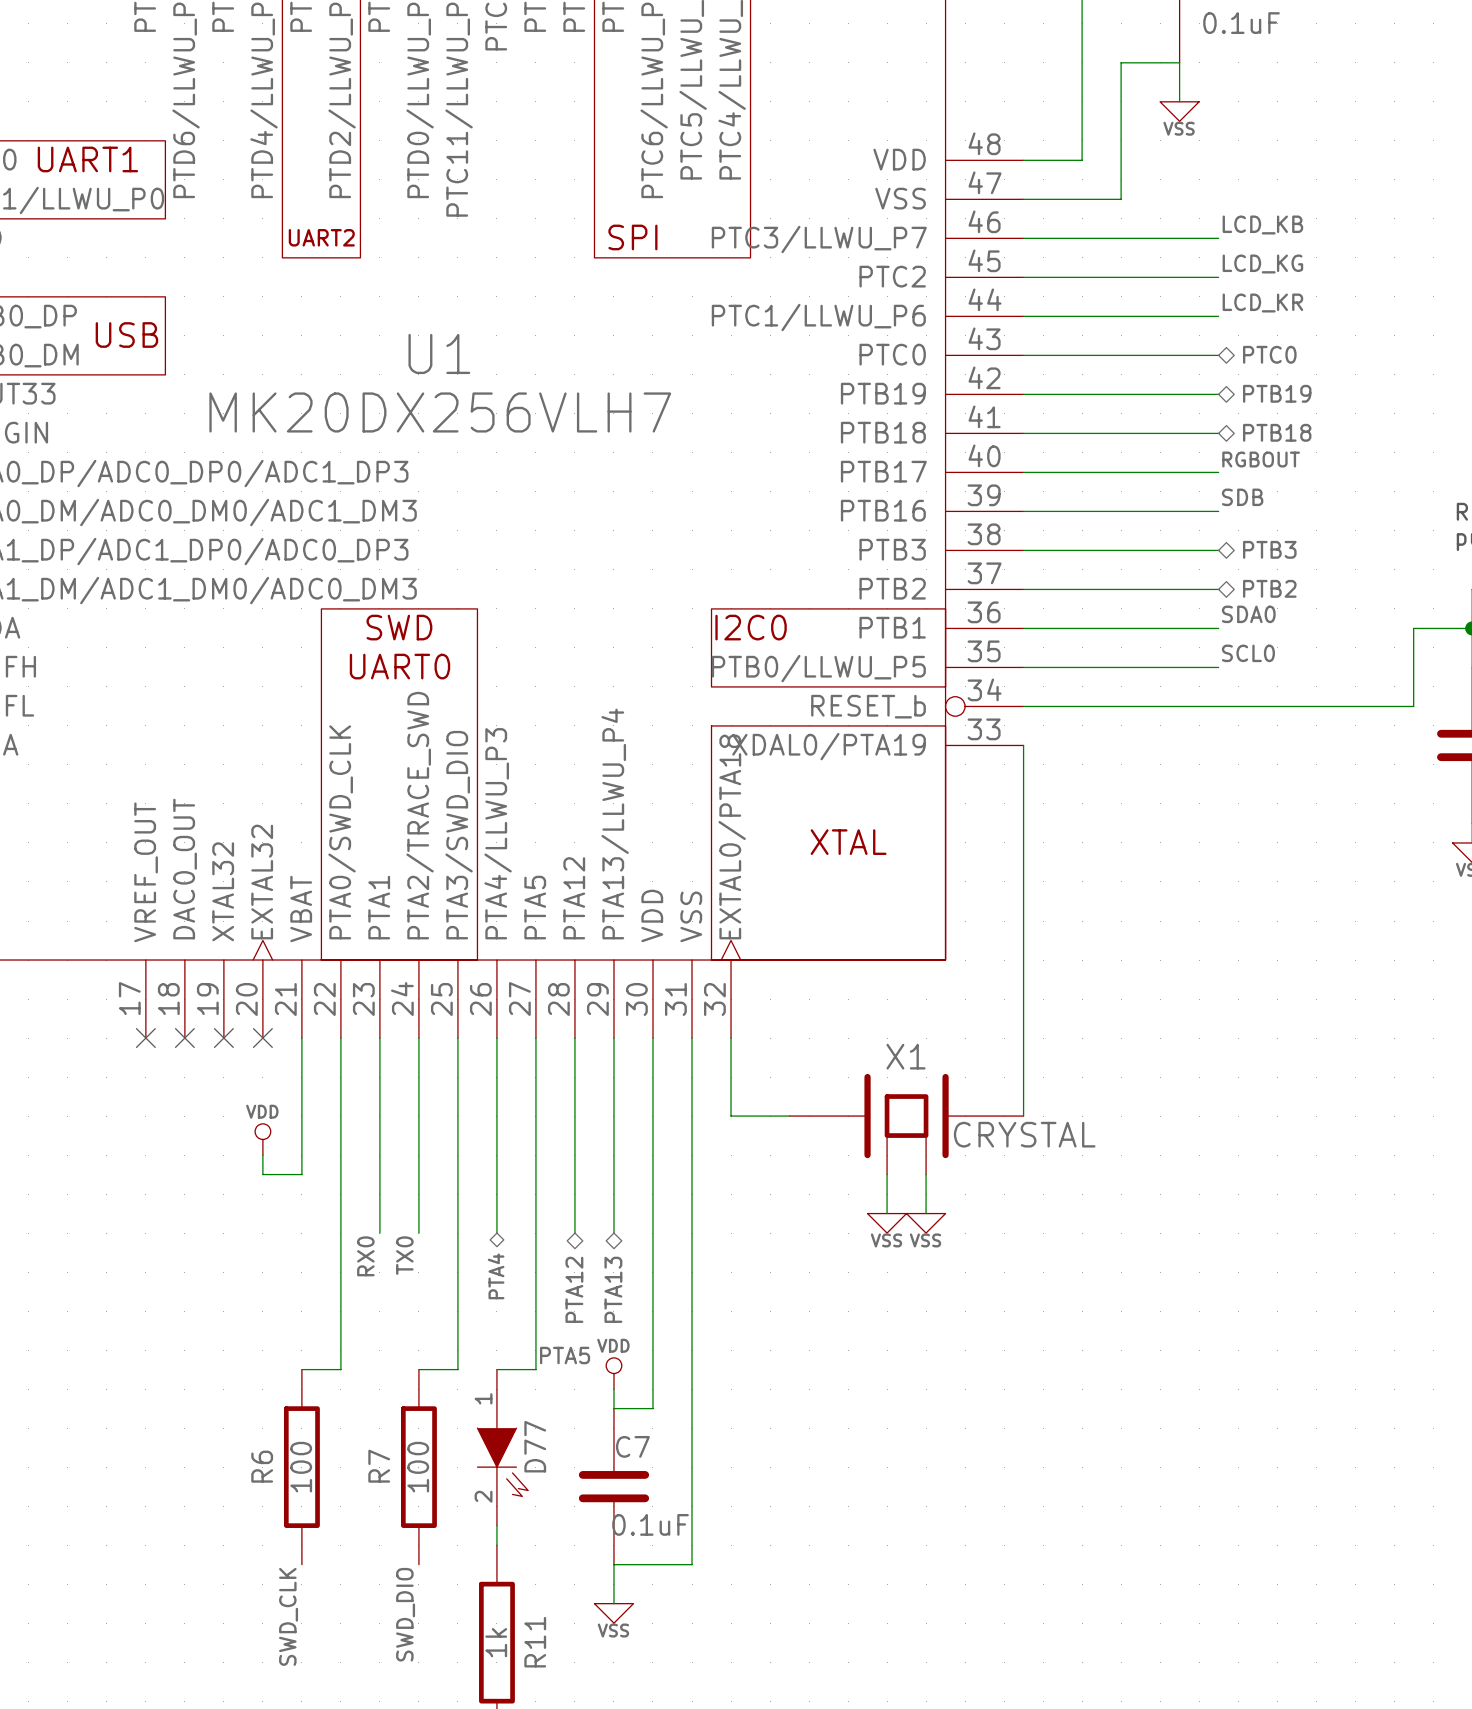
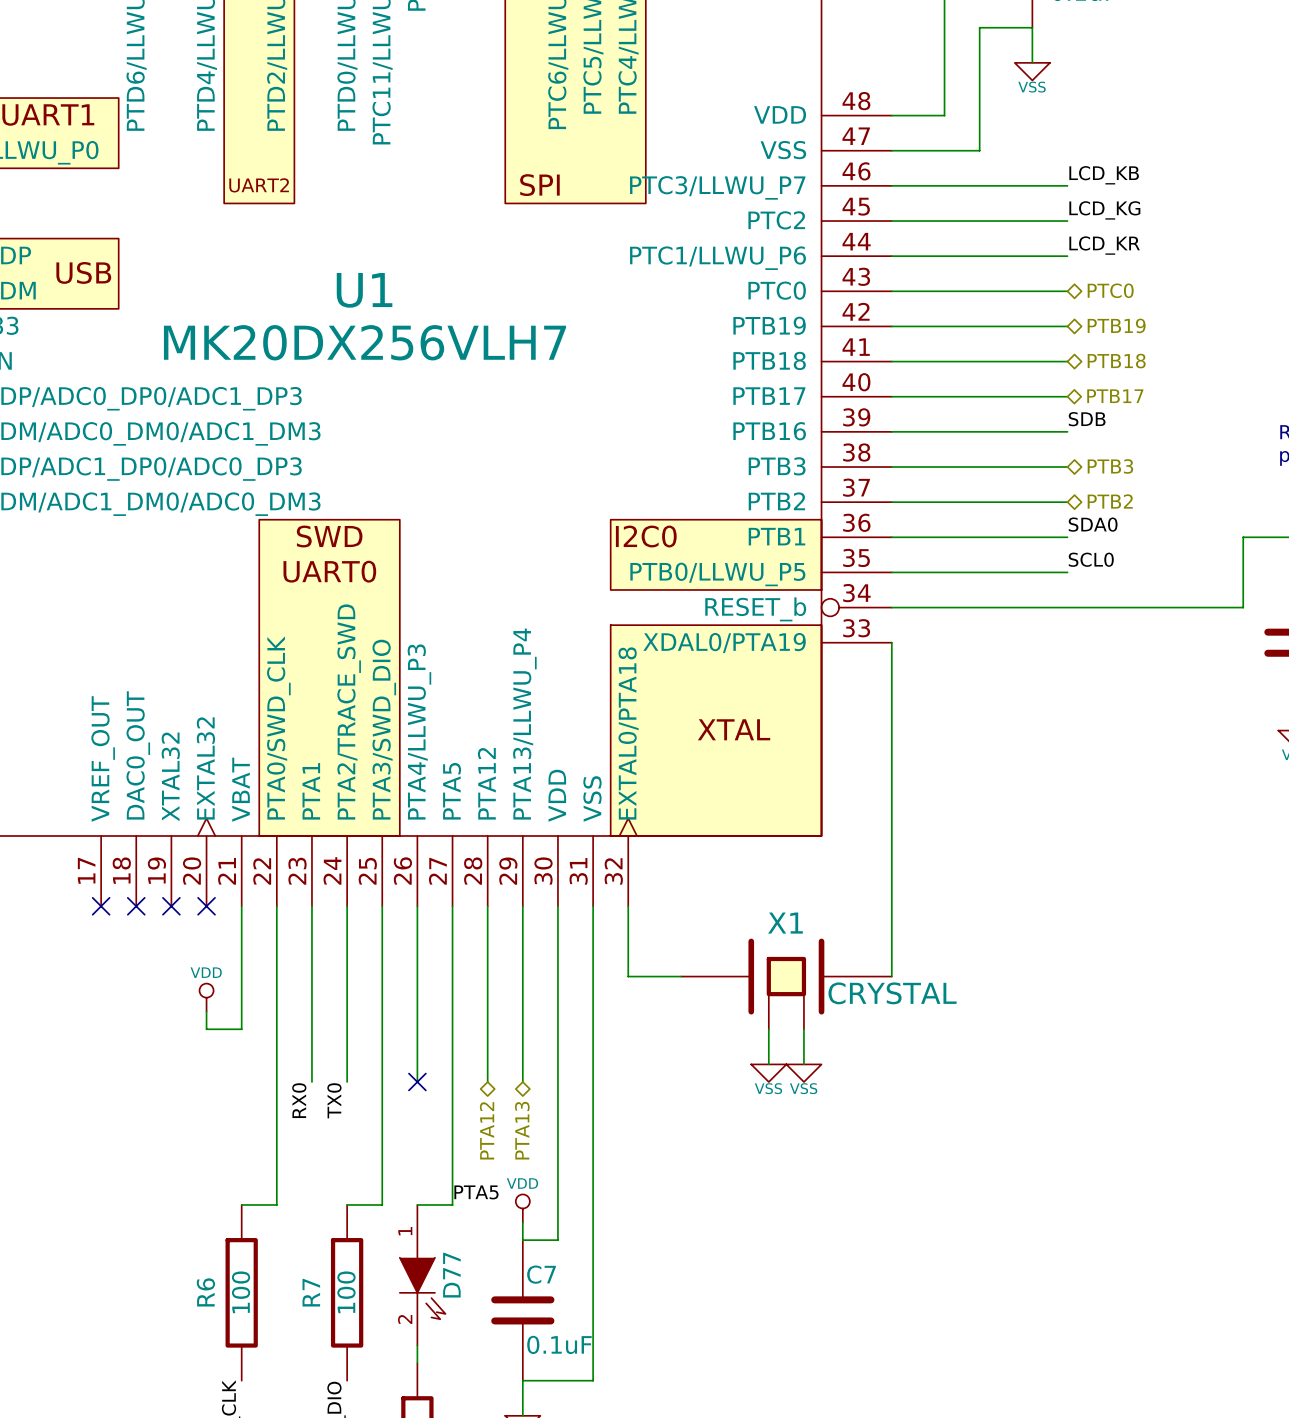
label: RGBOUT (1261, 459) -> none
hierarchical label: none -> PTB17 (1115, 396)
no-connect mark: none -> (417, 1081)
hierarchical label: PTA4 (496, 1276) -> none

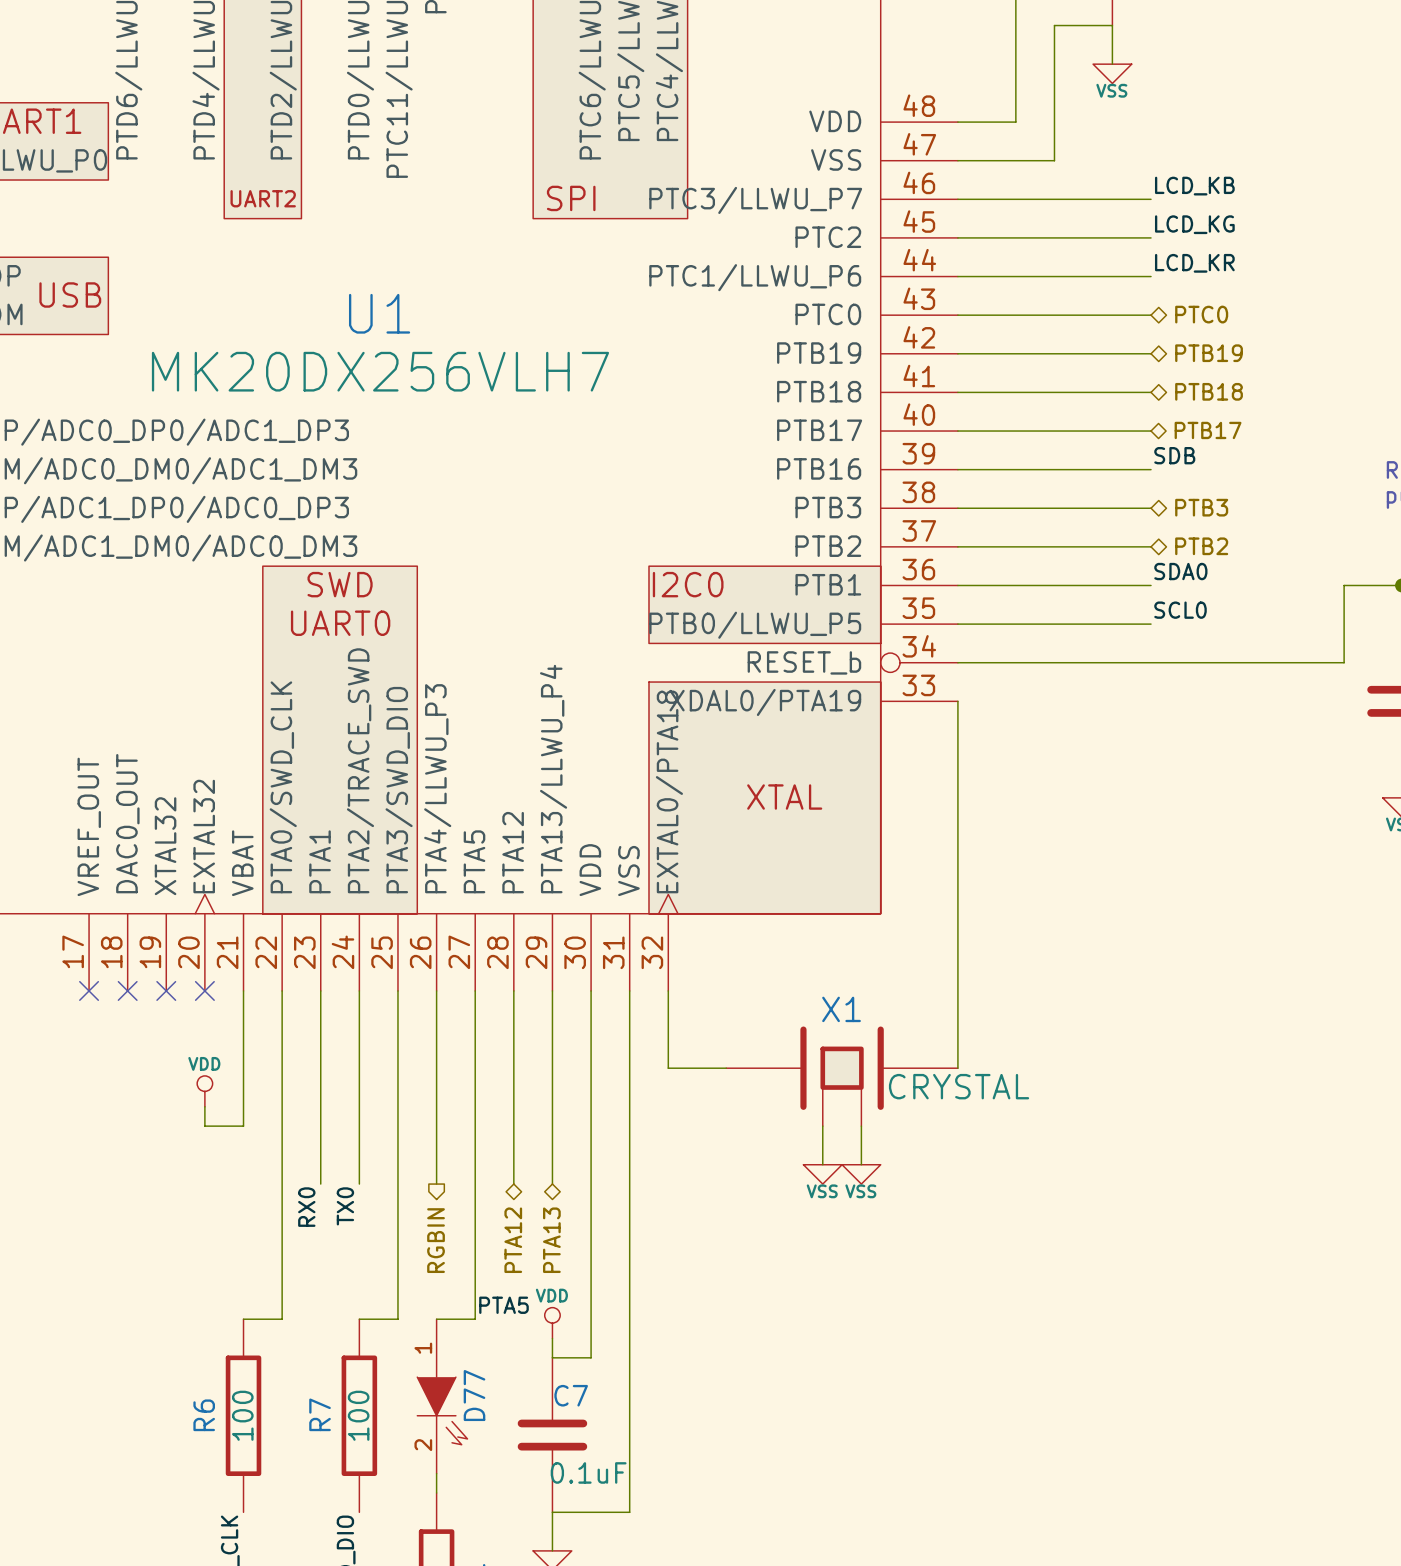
no-connect mark: (417, 1081) -> none
hierarchical label: none -> RGBIN (436, 1240)

